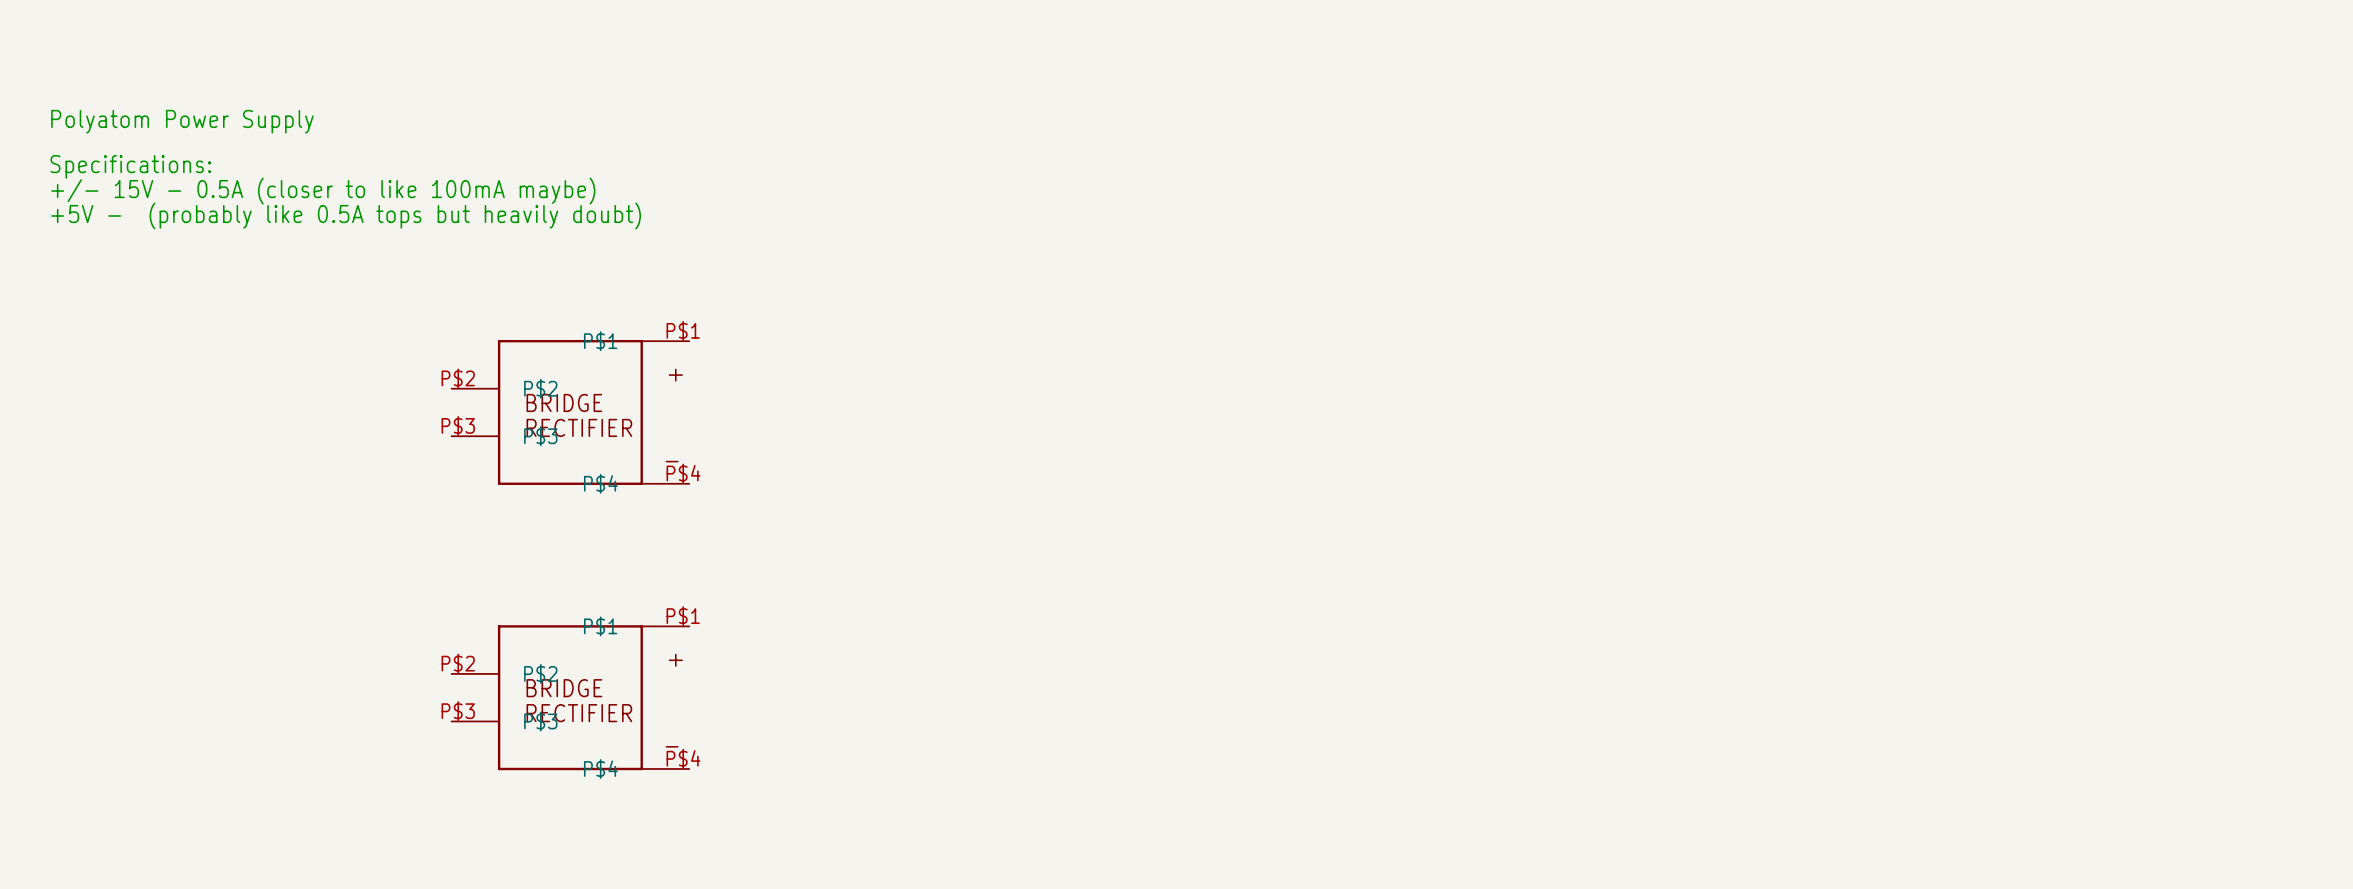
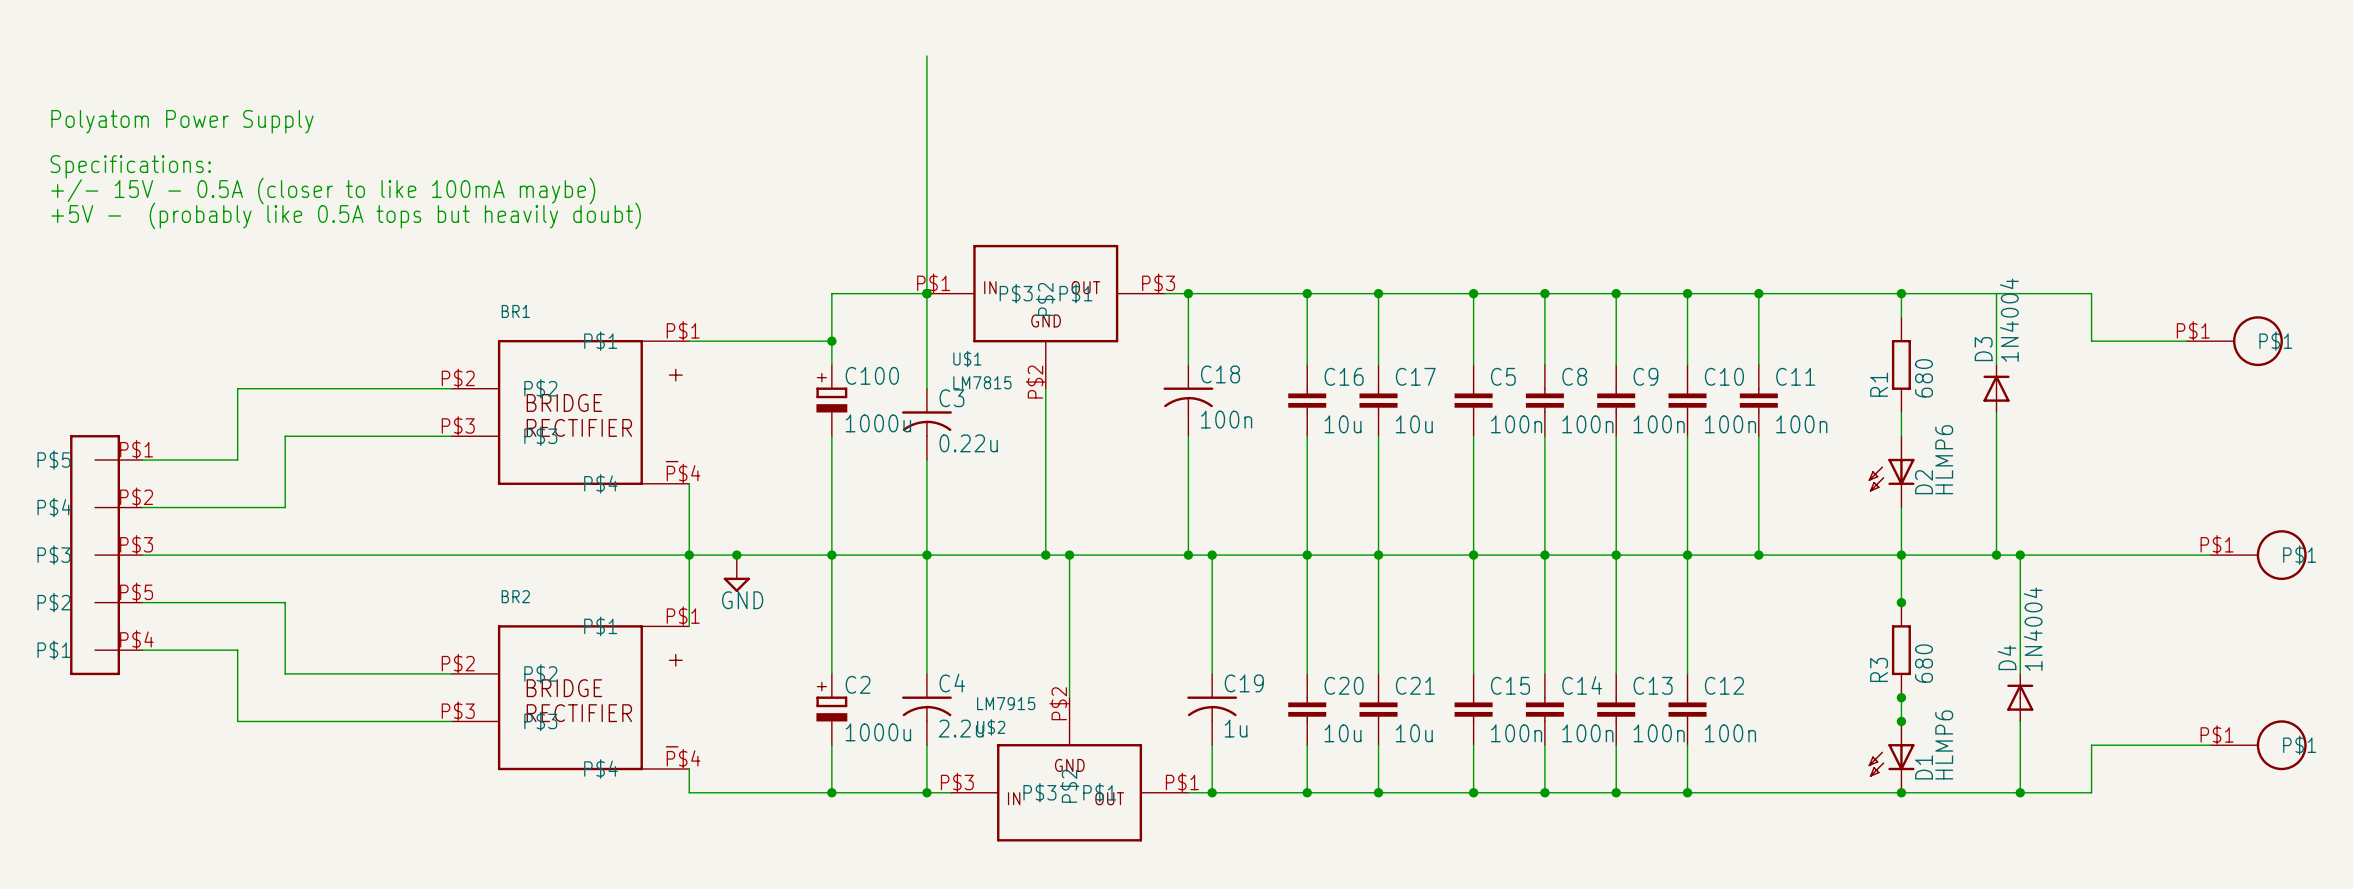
wire: none -> (926, 55) (926, 388)
wire: none -> (926, 293) (831, 293) (831, 364)
junction: none -> (926, 293)
wire: none -> (1164, 293) (2091, 293) (2091, 341) (2186, 341)
wire: none -> (1188, 293) (1188, 364)
junction: none -> (1188, 293)
wire: none -> (1307, 293) (1307, 364)
junction: none -> (1307, 293)
wire: none -> (1378, 293) (1378, 364)
junction: none -> (1378, 293)
wire: none -> (1473, 293) (1473, 364)
junction: none -> (1473, 293)
wire: none -> (1544, 293) (1544, 364)
junction: none -> (1544, 293)
wire: none -> (1616, 293) (1616, 364)
junction: none -> (1616, 293)
wire: none -> (1687, 293) (1687, 364)
junction: none -> (1687, 293)
wire: none -> (1758, 293) (1758, 364)
junction: none -> (1758, 293)
wire: none -> (1901, 293) (1901, 317)
junction: none -> (1901, 293)
wire: none -> (1996, 293) (1996, 364)
BR1 name: none -> BR1 (515, 311)
U$1: none -> LM7815 (1045, 316)
wire: none -> (689, 341) (831, 341)
junction: none -> (831, 341)
part: none -> (2234, 341)
R1: none -> 680 (1901, 364)
wire: none -> (451, 388) (237, 388) (237, 460) (142, 460)
wire: none -> (1045, 388) (1045, 555)
D3: none -> 1N4004 (1996, 388)
C100: none -> 1000u (831, 400)
C18: none -> 100n (1188, 400)
C16: none -> 10u (1307, 400)
C17: none -> 10u (1378, 400)
C5: none -> 100n (1473, 400)
C8: none -> 100n (1544, 400)
C9: none -> 100n (1616, 400)
C10: none -> 100n (1687, 400)
C11: none -> 100n (1758, 400)
wire: none -> (1901, 412) (1901, 436)
wire: none -> (1996, 412) (1996, 555)
C3: none -> 0.22u (926, 424)
wire: none -> (451, 436) (285, 436) (285, 507) (142, 507)
wire: none -> (831, 436) (831, 673)
wire: none -> (1188, 436) (1188, 555)
wire: none -> (1307, 436) (1307, 673)
wire: none -> (1378, 436) (1378, 673)
wire: none -> (1473, 436) (1473, 673)
wire: none -> (1544, 436) (1544, 673)
wire: none -> (1616, 436) (1616, 673)
wire: none -> (1687, 436) (1687, 673)
wire: none -> (1758, 436) (1758, 555)
wire: none -> (926, 460) (926, 673)
D2: none -> HLMP6 (1891, 471)
wire: none -> (689, 483) (689, 626)
wire: none -> (1901, 507) (1901, 602)
part: none -> (106, 555)
wire: none -> (142, 555) (2210, 555)
junction: none -> (689, 555)
junction: none -> (736, 555)
junction: none -> (831, 555)
junction: none -> (926, 555)
junction: none -> (1045, 555)
wire: none -> (1069, 555) (1069, 697)
junction: none -> (1069, 555)
junction: none -> (1188, 555)
wire: none -> (1212, 555) (1212, 673)
junction: none -> (1212, 555)
junction: none -> (1307, 555)
junction: none -> (1378, 555)
junction: none -> (1473, 555)
junction: none -> (1544, 555)
junction: none -> (1616, 555)
junction: none -> (1687, 555)
junction: none -> (1758, 555)
junction: none -> (1901, 555)
junction: none -> (1996, 555)
wire: none -> (2020, 555) (2020, 673)
junction: none -> (2020, 555)
part: none -> (2258, 555)
power symbol: none -> GND (736, 573)
BR2 name: none -> BR2 (515, 596)
wire: none -> (142, 602) (285, 602) (285, 673) (451, 673)
junction: none -> (1901, 602)
wire: none -> (142, 650) (237, 650) (237, 721) (451, 721)
R3: none -> 680 (1901, 650)
wire: none -> (1901, 697) (1901, 721)
junction: none -> (1901, 697)
D4: none -> 1N4004 (2020, 697)
C2: none -> 1000u (831, 709)
C4: none -> 2.2u (926, 709)
C19: none -> 1u (1212, 709)
C20: none -> 10u (1307, 709)
C21: none -> 10u (1378, 709)
C15: none -> 100n (1473, 709)
C14: none -> 100n (1544, 709)
C13: none -> 100n (1616, 709)
C12: none -> 100n (1687, 709)
junction: none -> (1901, 721)
wire: none -> (2020, 721) (2020, 792)
wire: none -> (831, 745) (831, 792)
wire: none -> (926, 745) (926, 792)
wire: none -> (1212, 745) (1212, 792)
wire: none -> (1307, 745) (1307, 792)
wire: none -> (1378, 745) (1378, 792)
wire: none -> (1473, 745) (1473, 792)
wire: none -> (1544, 745) (1544, 792)
wire: none -> (1616, 745) (1616, 792)
wire: none -> (1687, 745) (1687, 792)
wire: none -> (2210, 745) (2091, 745) (2091, 792) (1188, 792)
part: none -> (2258, 745)
D1: none -> HLMP6 (1891, 756)
wire: none -> (689, 769) (689, 792) (950, 792)
U$2: none -> LM7915 (1069, 769)
junction: none -> (831, 792)
junction: none -> (926, 792)
junction: none -> (1212, 792)
junction: none -> (1307, 792)
junction: none -> (1378, 792)
junction: none -> (1473, 792)
junction: none -> (1544, 792)
junction: none -> (1616, 792)
junction: none -> (1687, 792)
junction: none -> (1901, 792)
junction: none -> (2020, 792)

